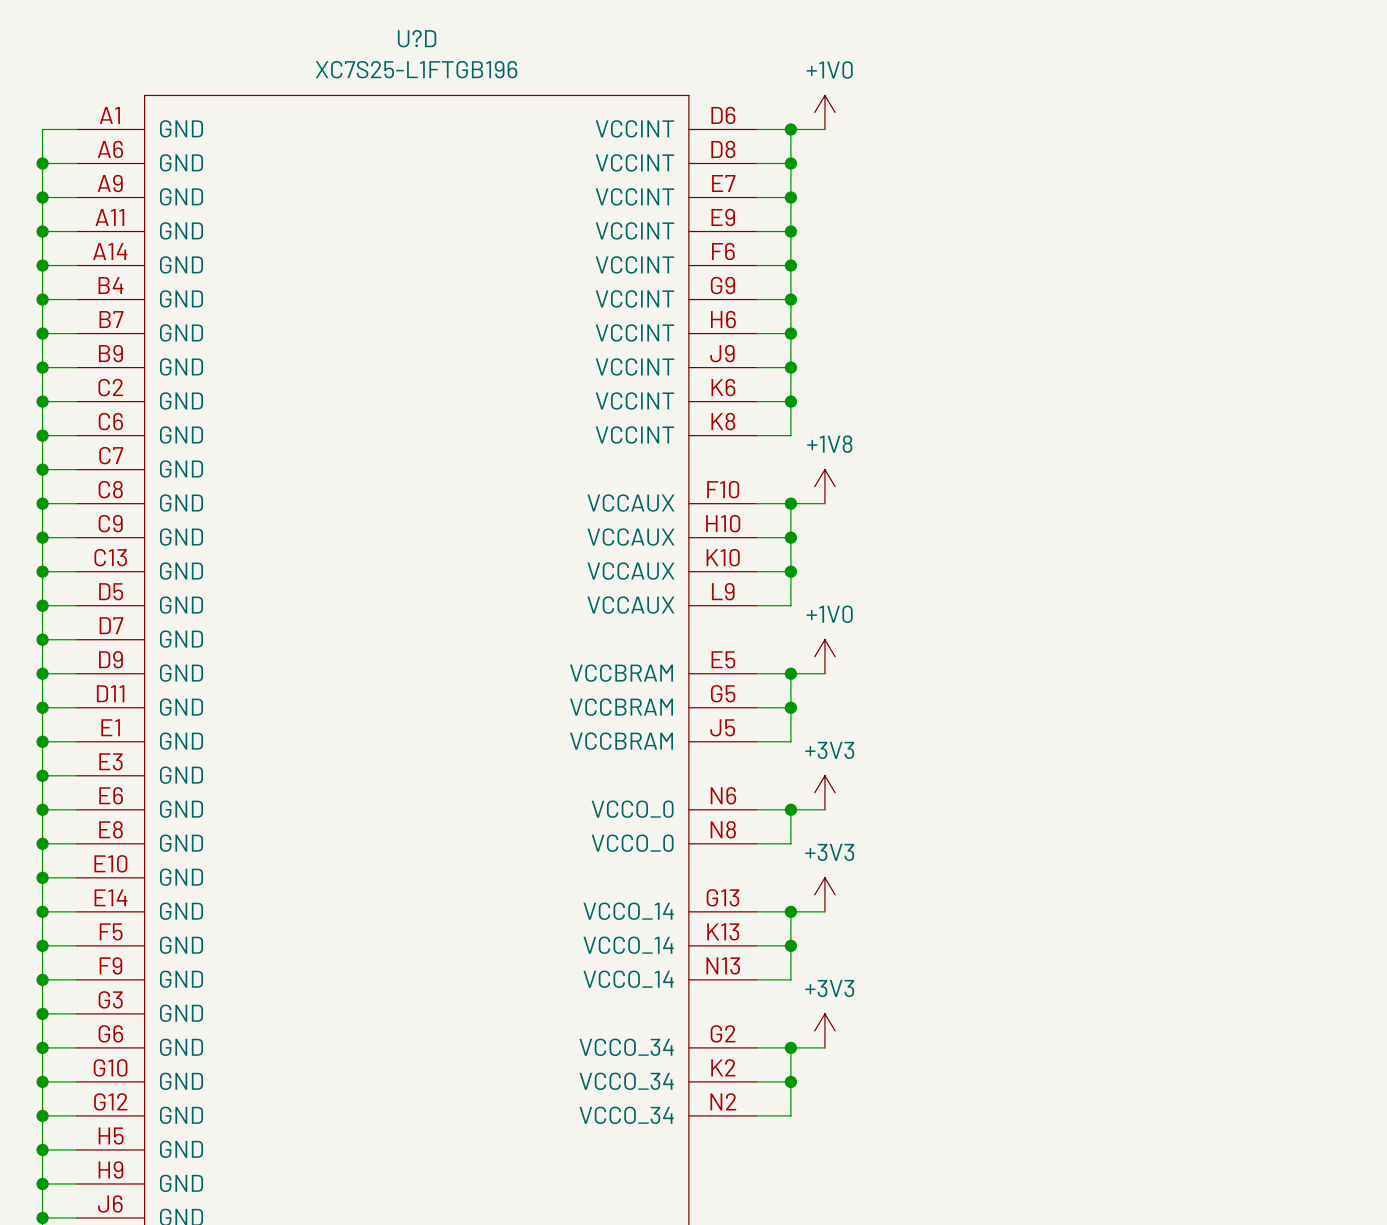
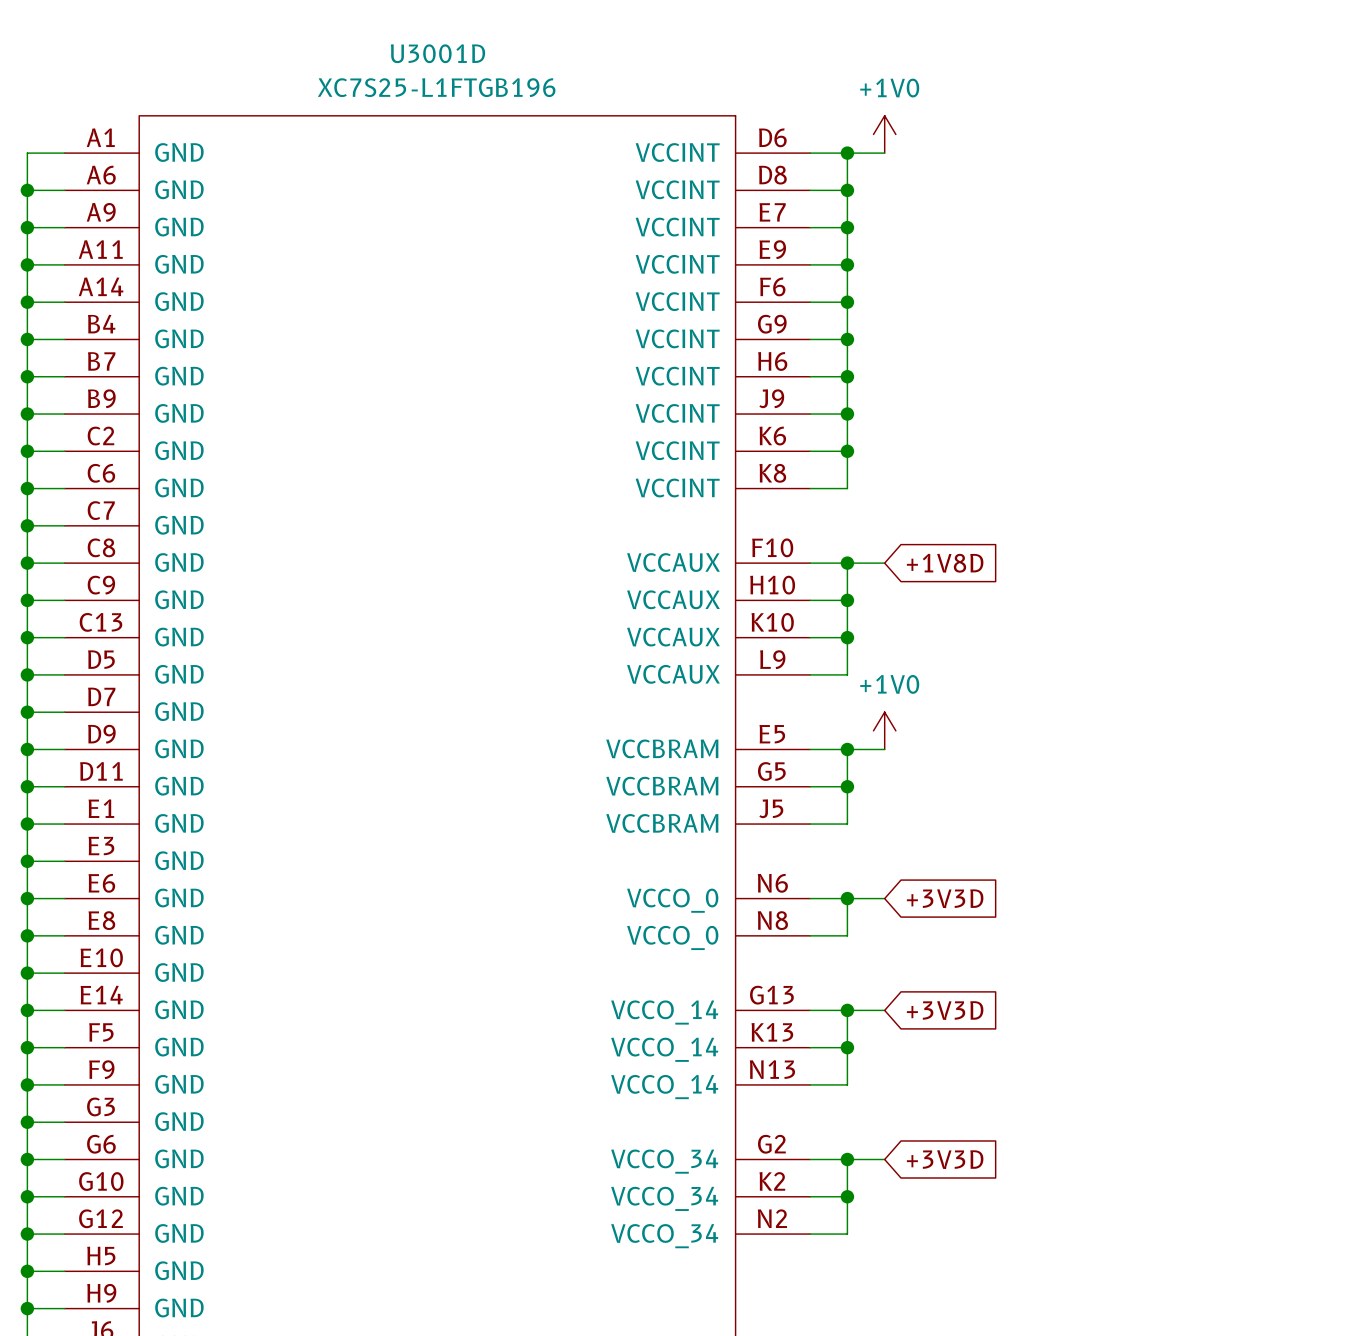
U?D name: U?D (417, 38) -> U3001D (437, 53)
power symbol: +1V8 (824, 486) -> none
global label: none -> +1V8D (945, 563)
power symbol: +3V3 (824, 792) -> none
global label: none -> +3V3D (945, 898)
power symbol: +3V3 (824, 894) -> none
global label: none -> +3V3D (945, 1010)
power symbol: +3V3 (824, 1030) -> none
global label: none -> +3V3D (945, 1159)

